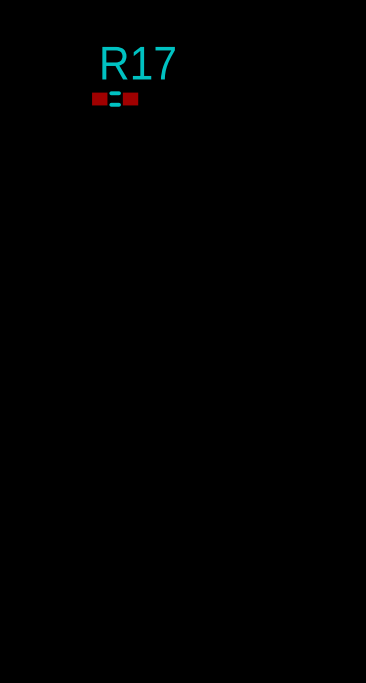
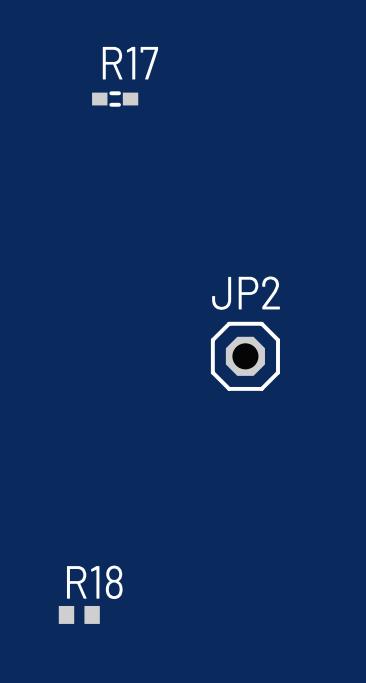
JP2: none -> (245, 356)
R18: none -> (79, 614)

